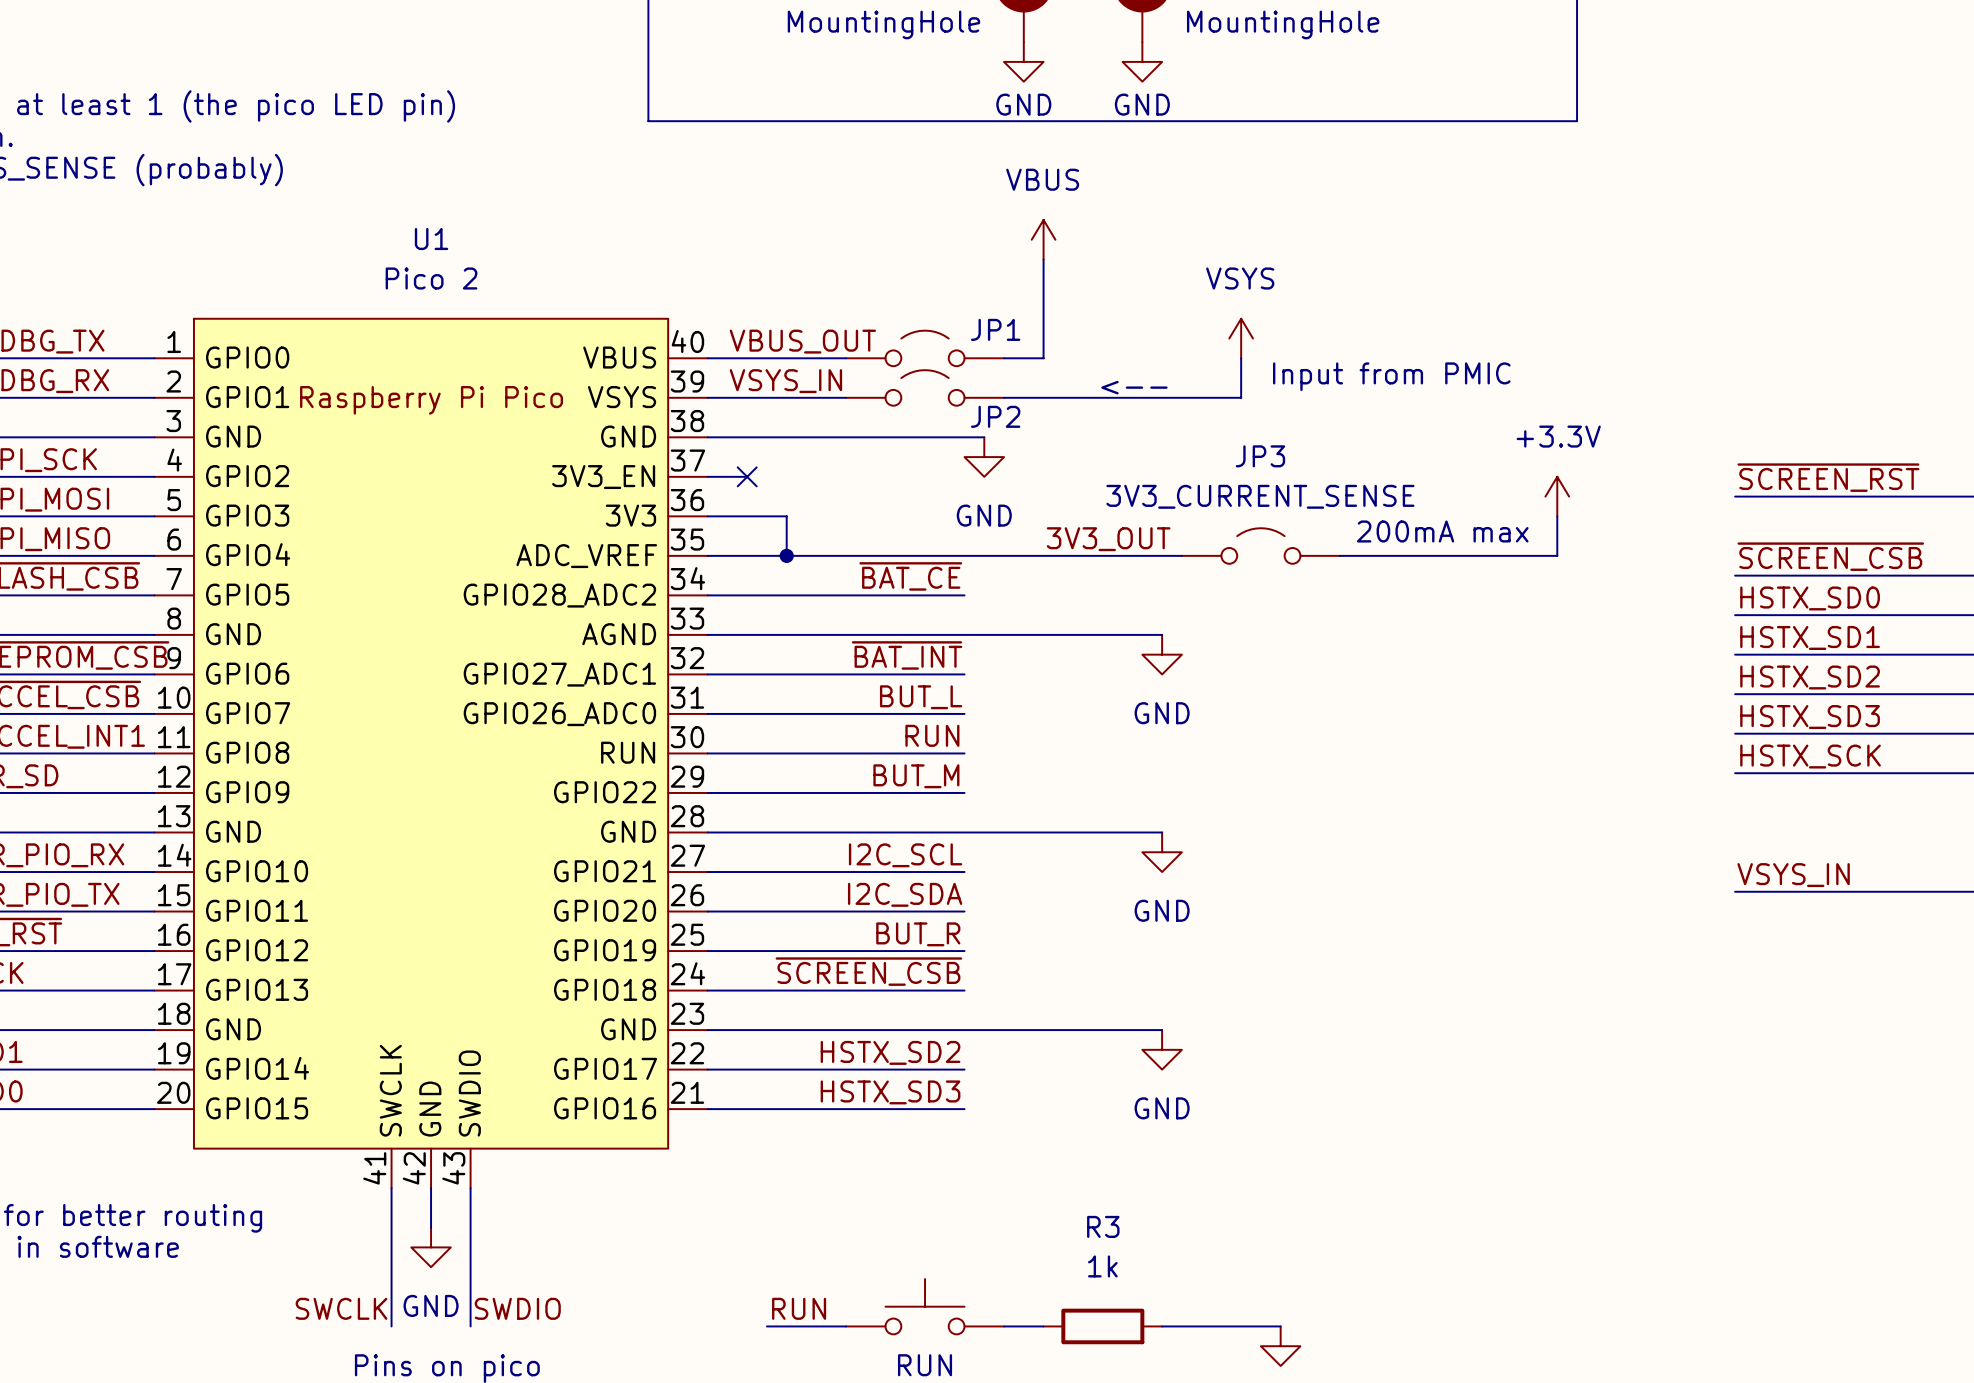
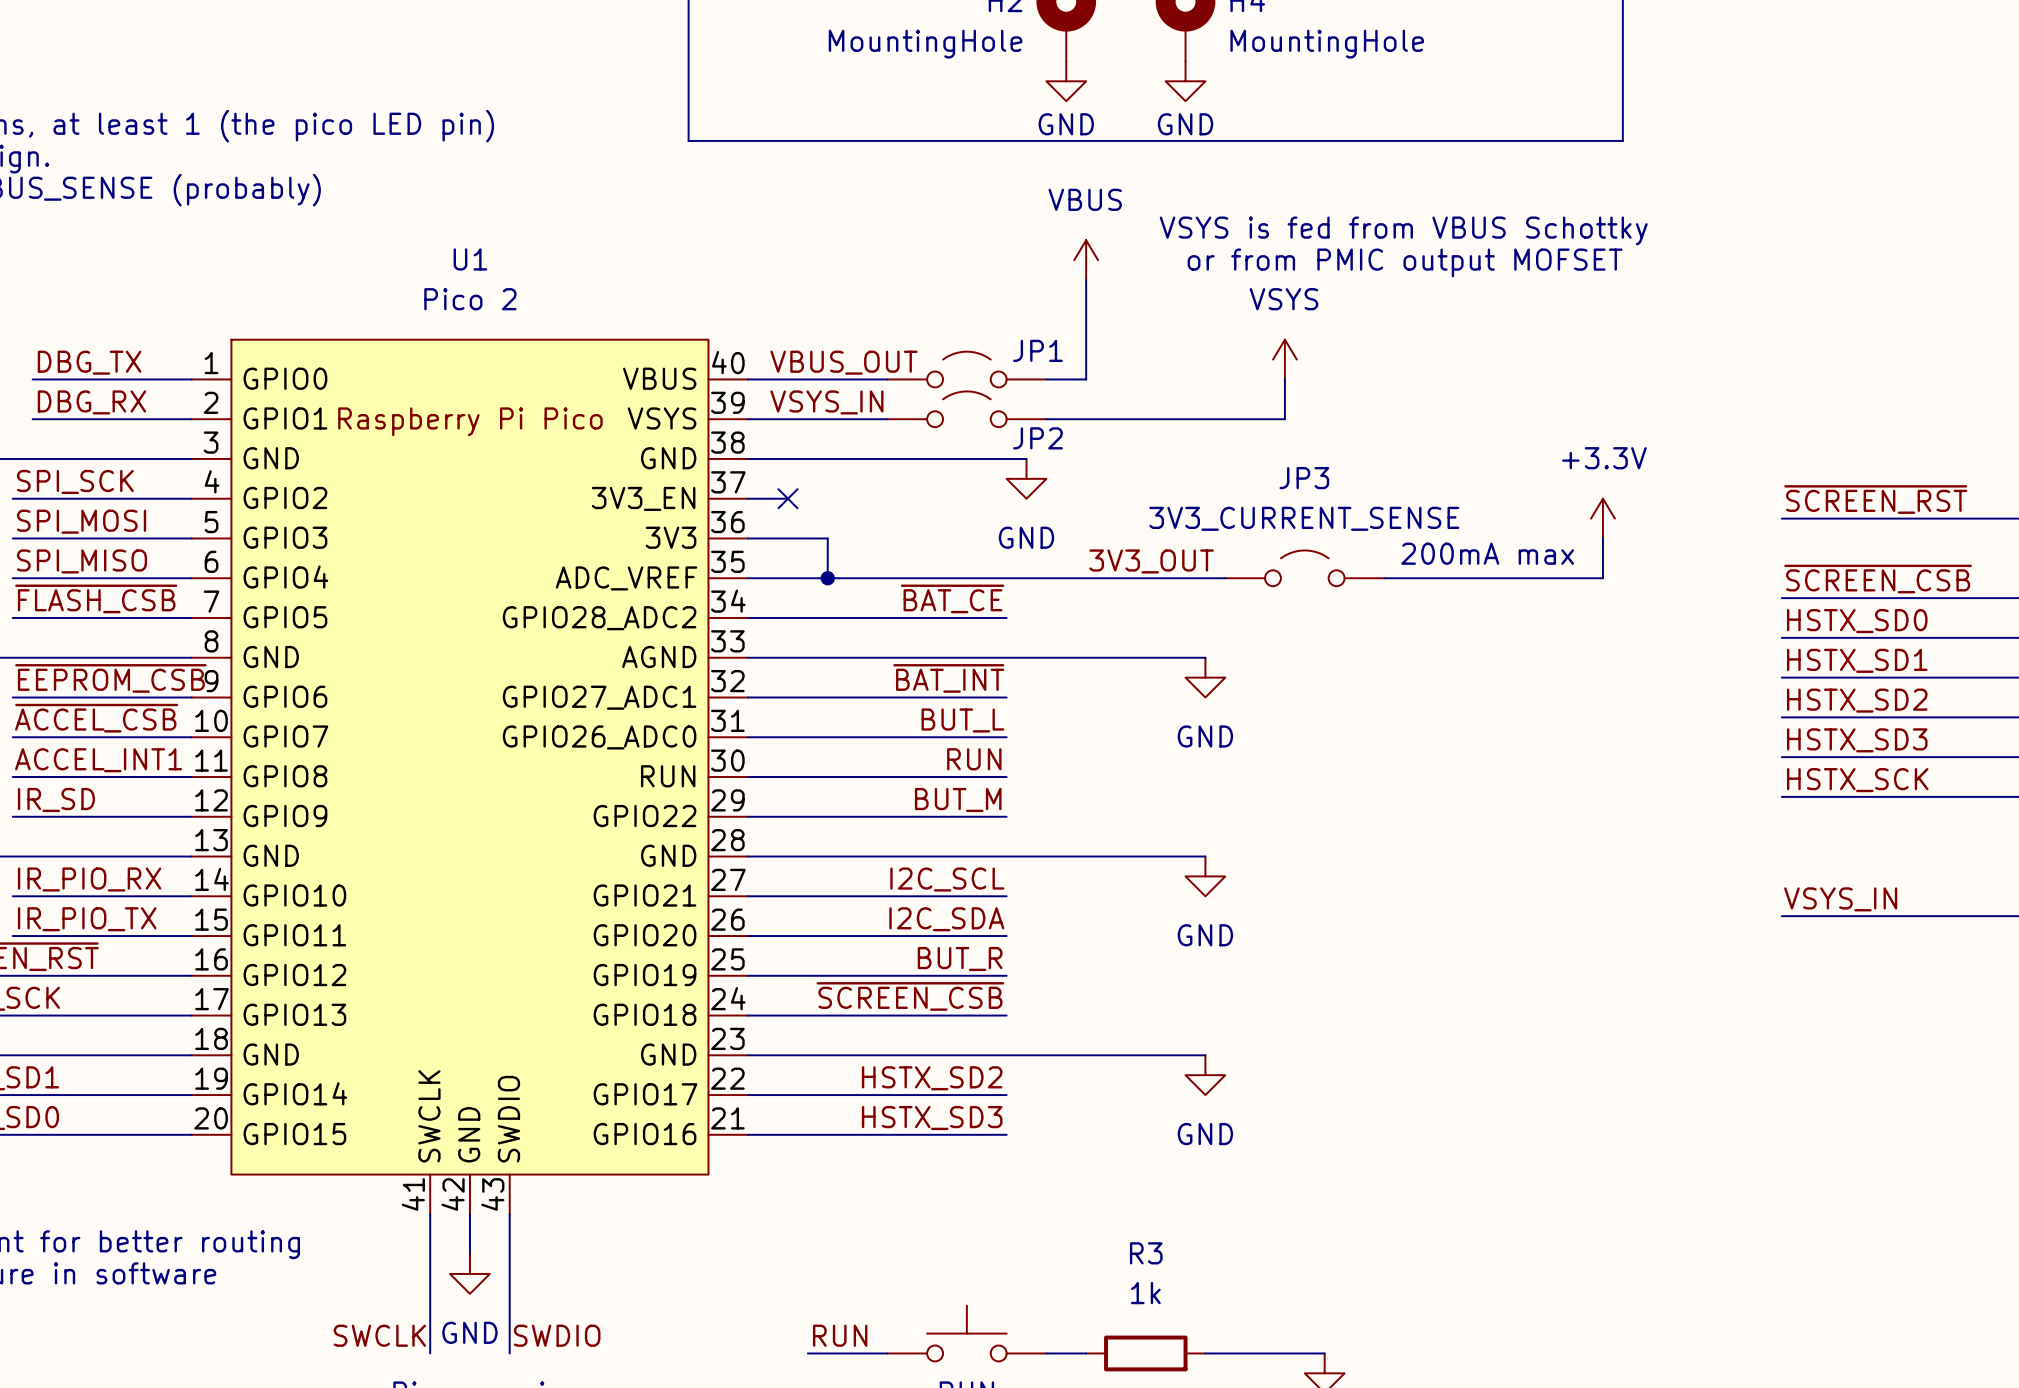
text: none -> VSYS is fed from VBUS Schottky (1403, 230)
text: none -> or from PMIC output MOFSET (1405, 262)
text: Input from PMIC (1391, 376) -> none
text: <-- (1134, 387) -> none

